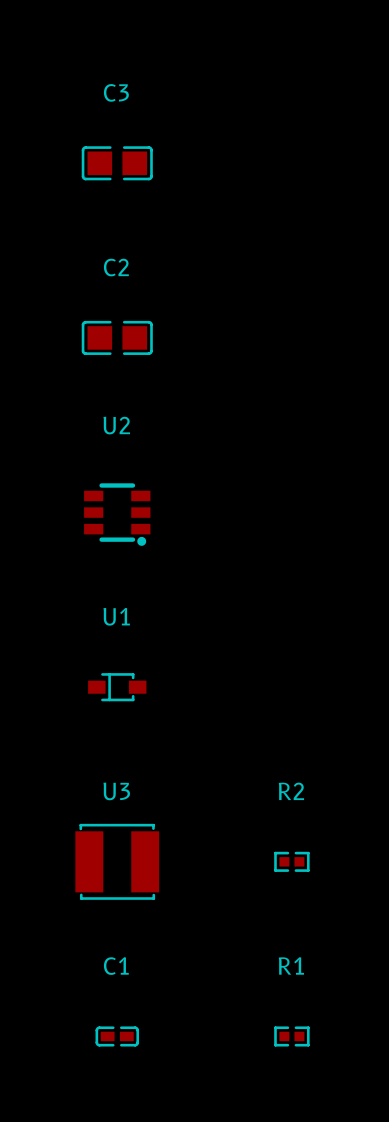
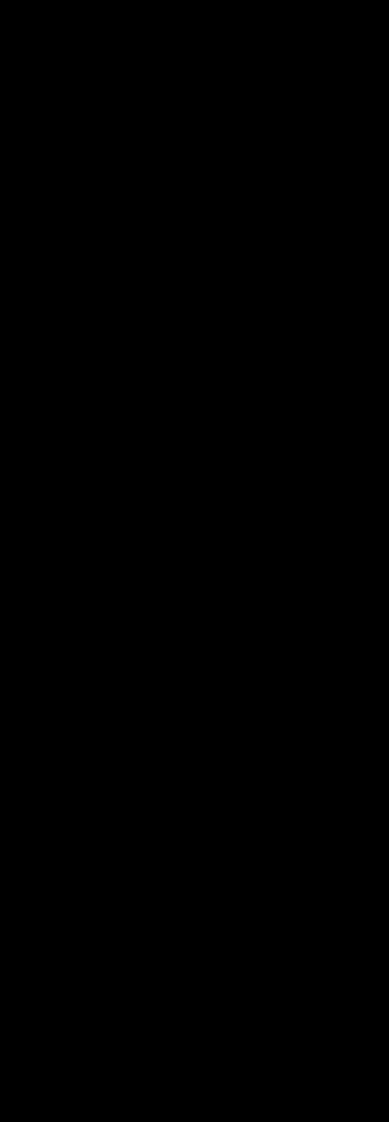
C3: (117, 163) -> none
C2: (117, 337) -> none
U2: (117, 514) -> none
U1: (117, 687) -> none
U3: (117, 861) -> none
R2: (291, 861) -> none
C1: (117, 1036) -> none
R1: (291, 1036) -> none

